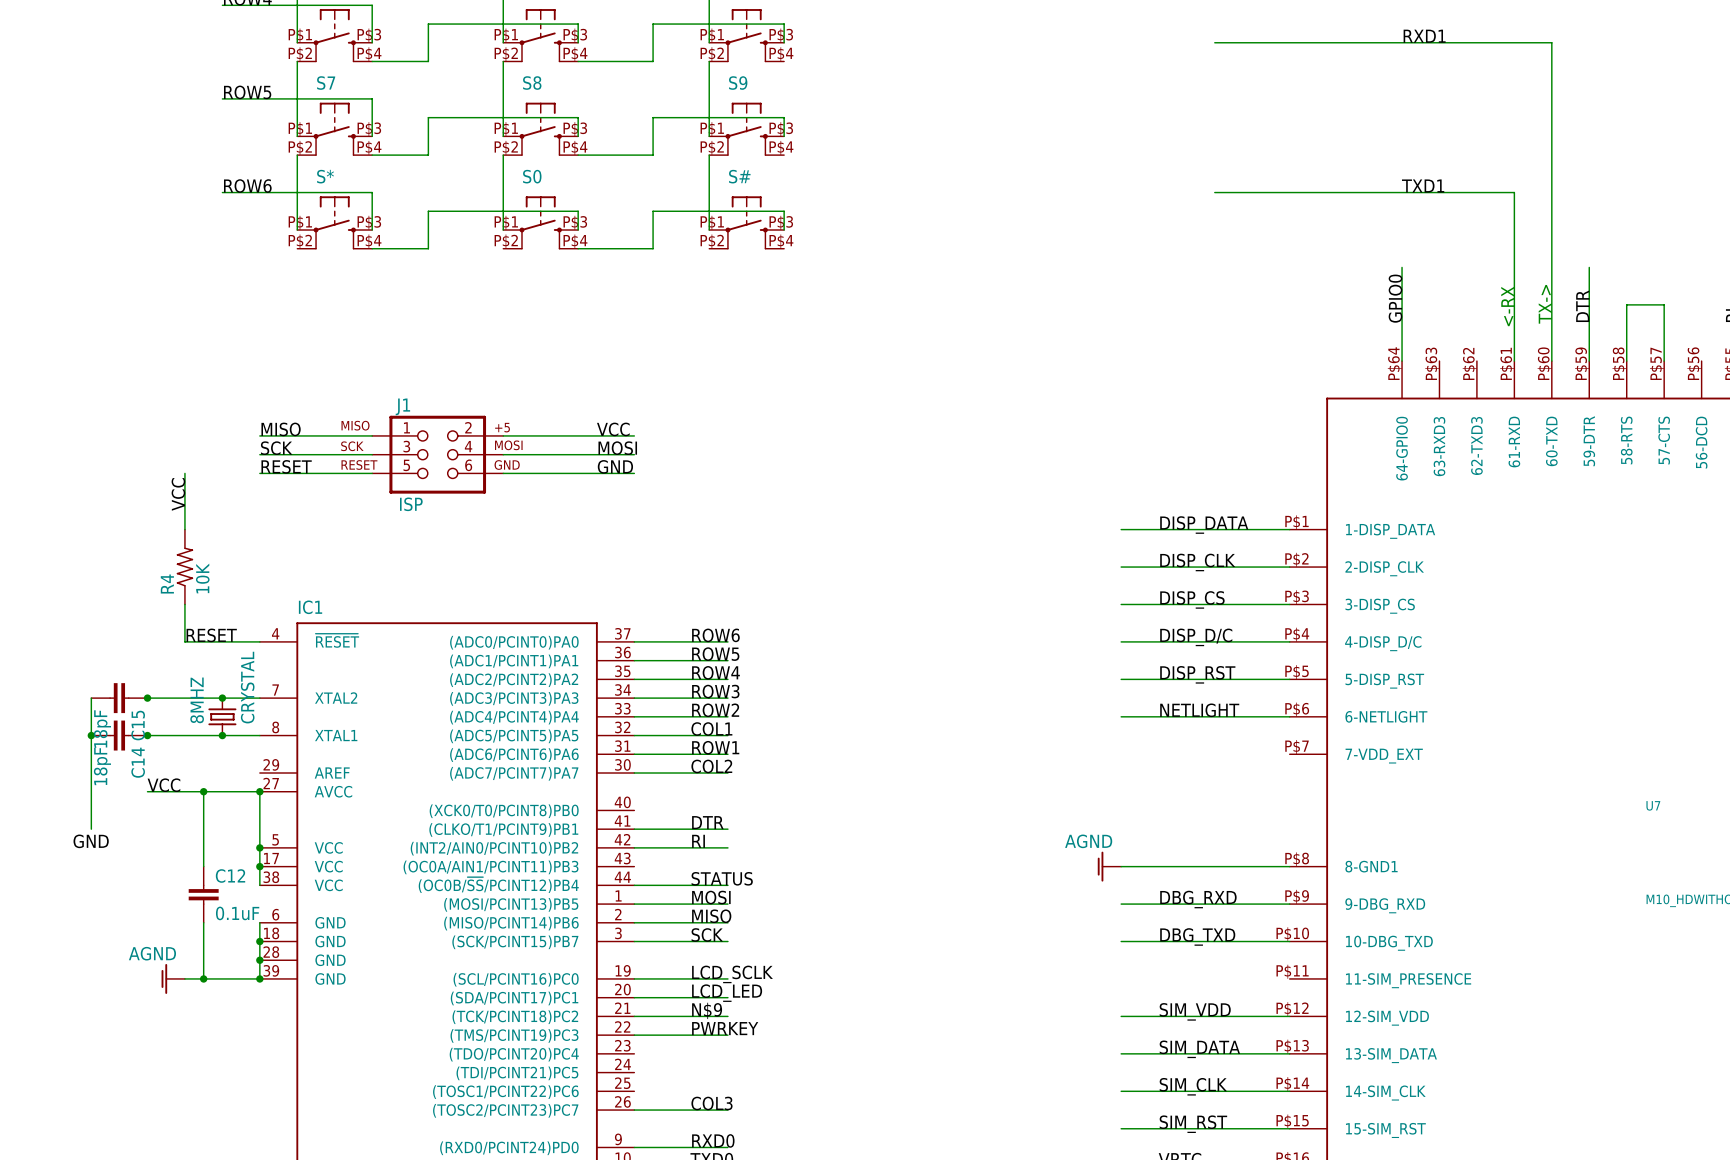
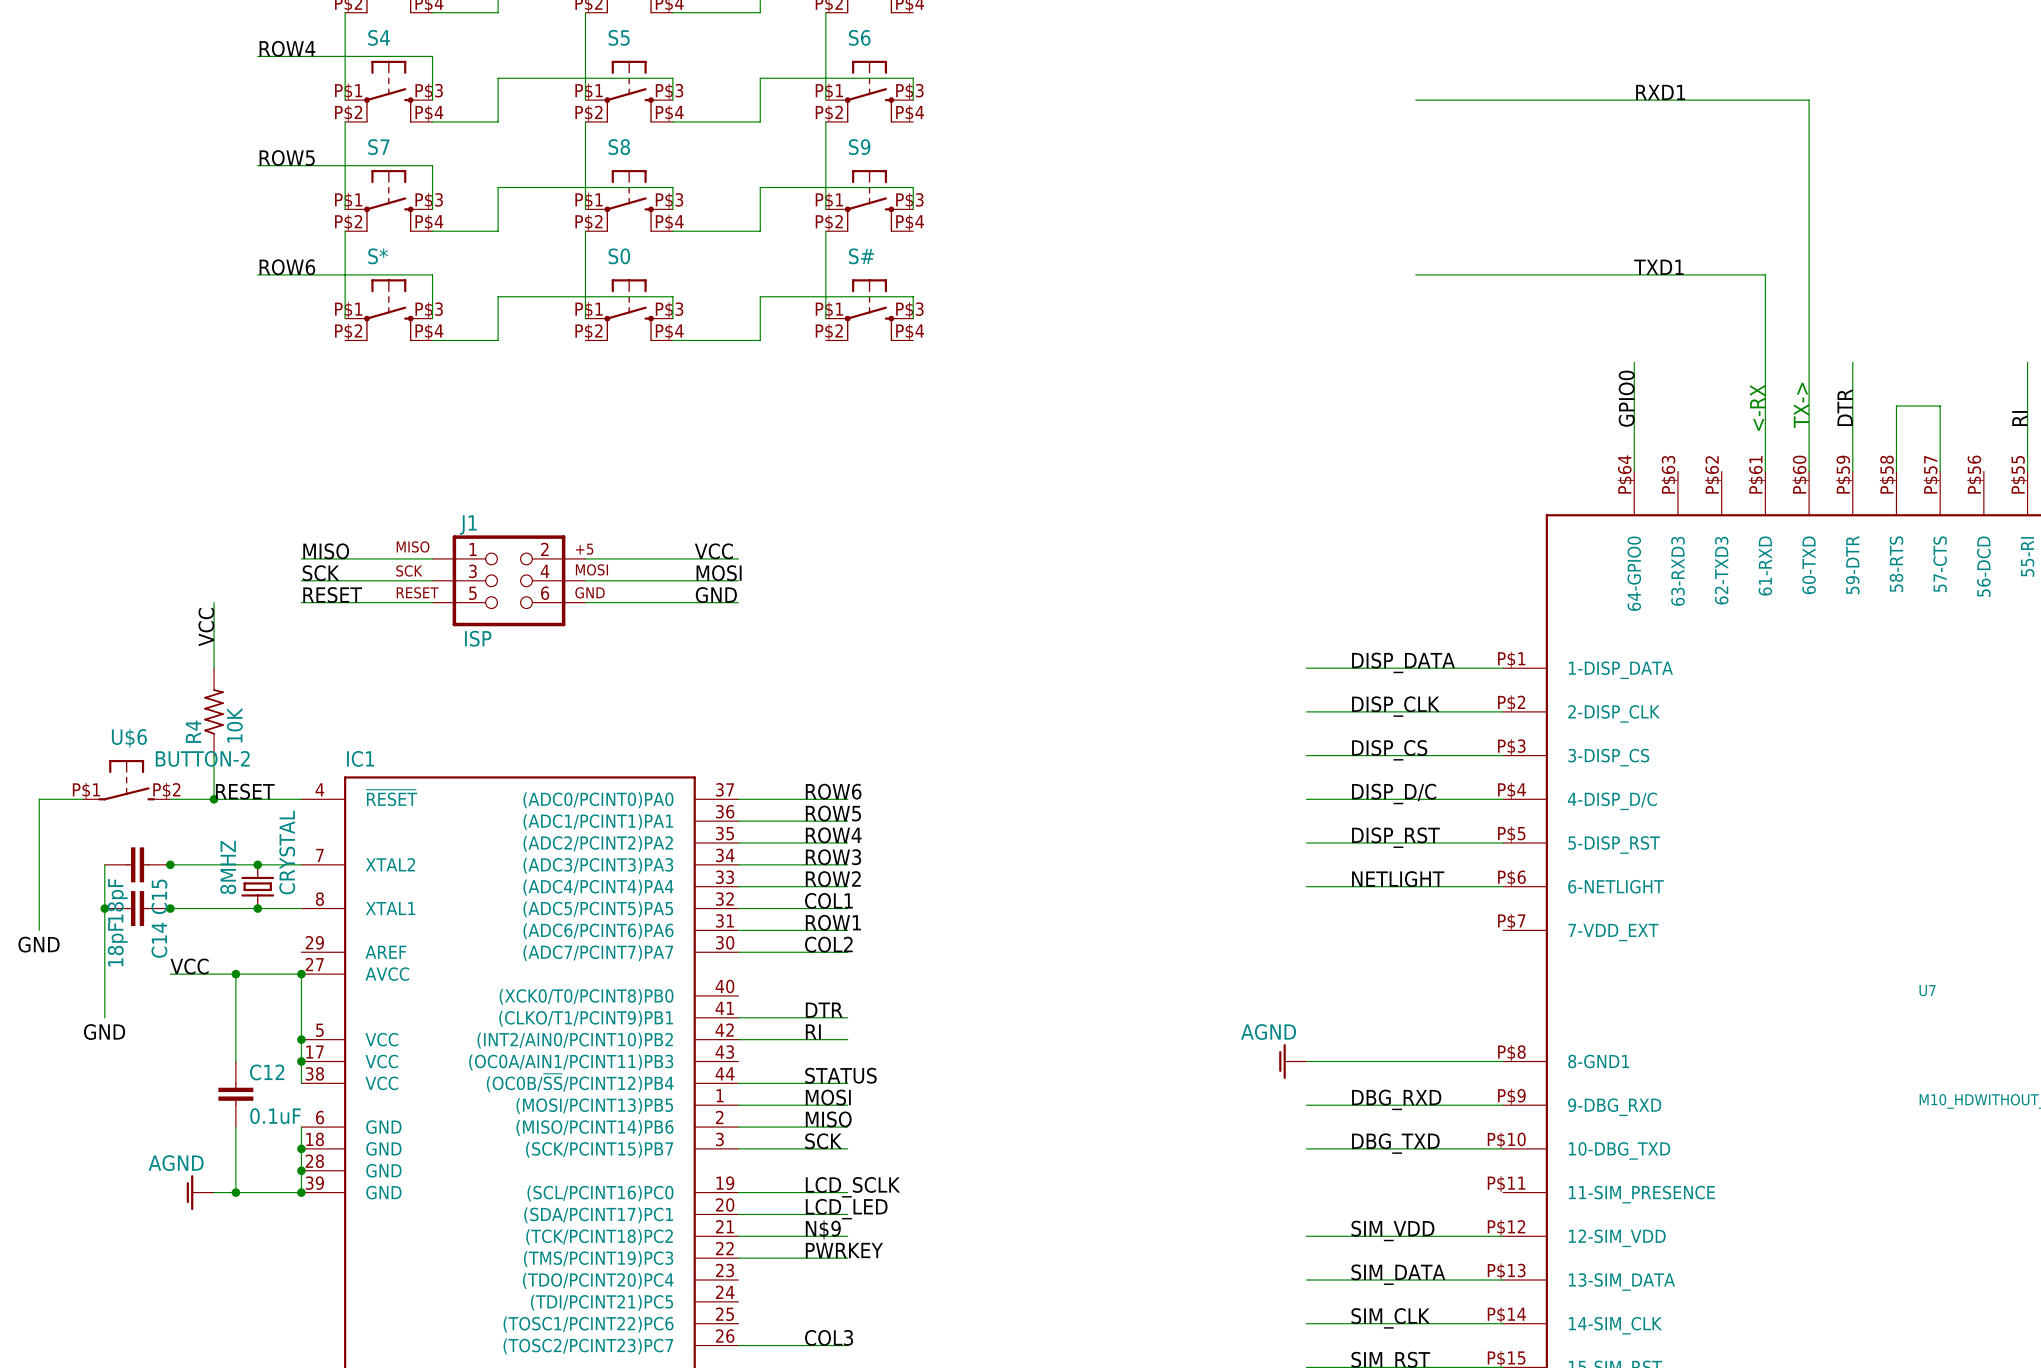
U$6: none -> BUTTON-2 (126, 780)
wire: none -> (82, 799) (39, 799) (39, 930)
wire: none -> (170, 799) (214, 799)
junction: none -> (214, 799)
label: none -> GND (39, 944)

